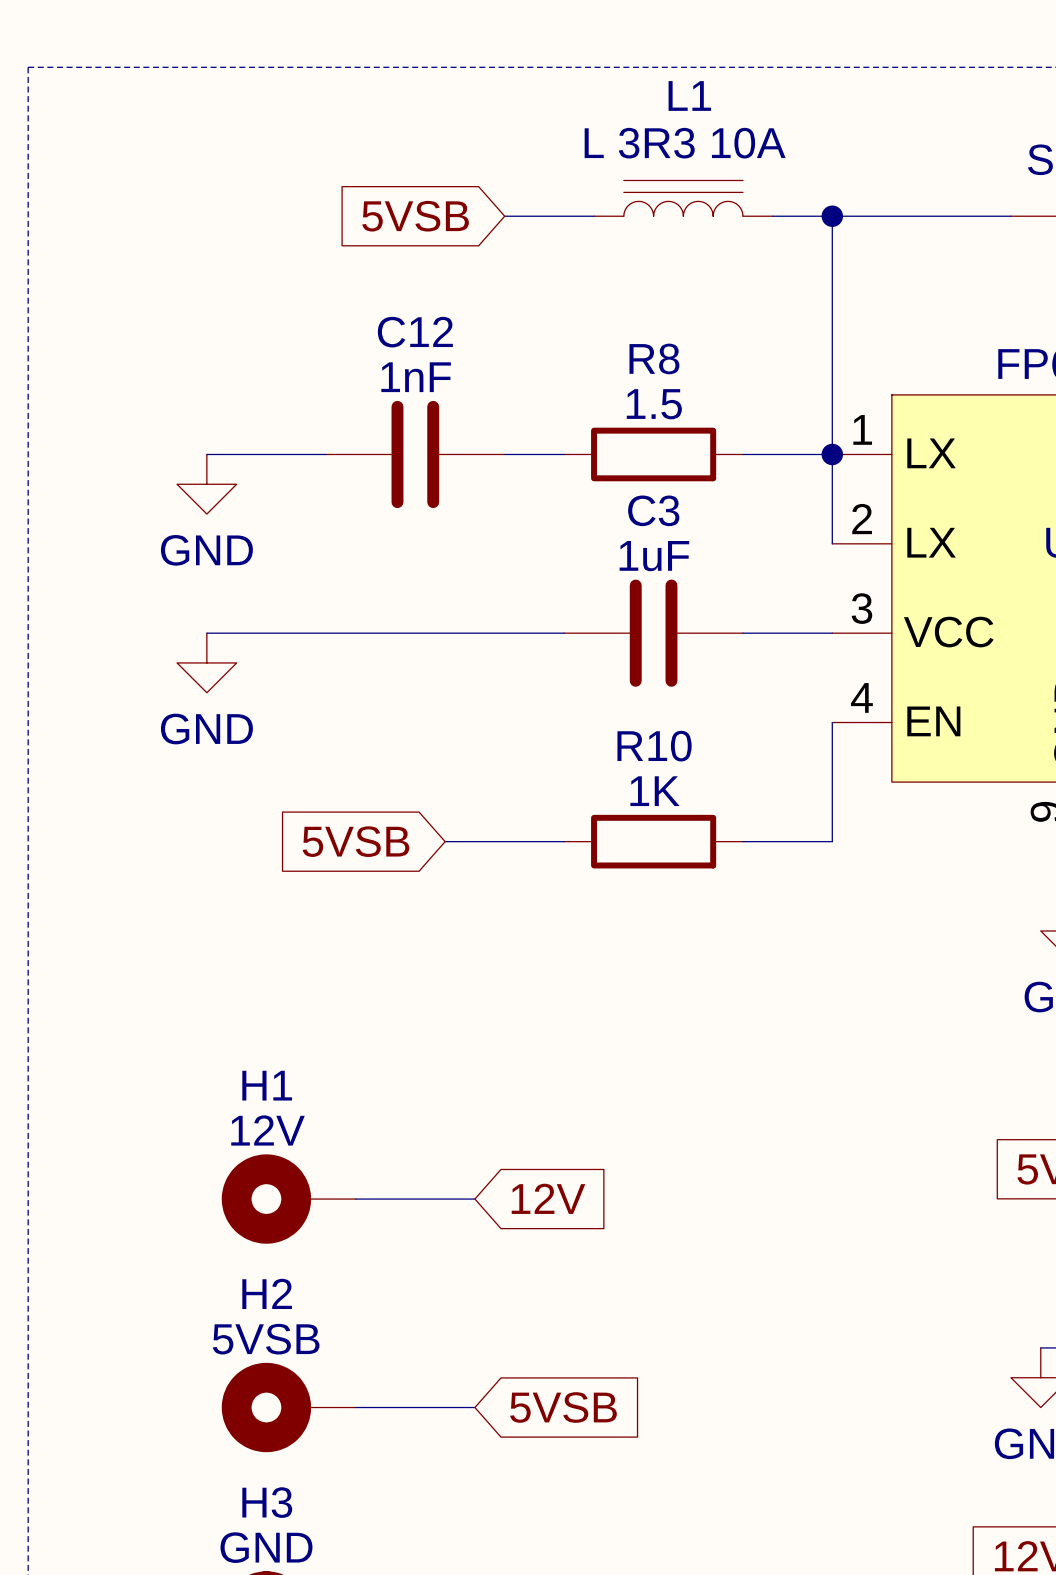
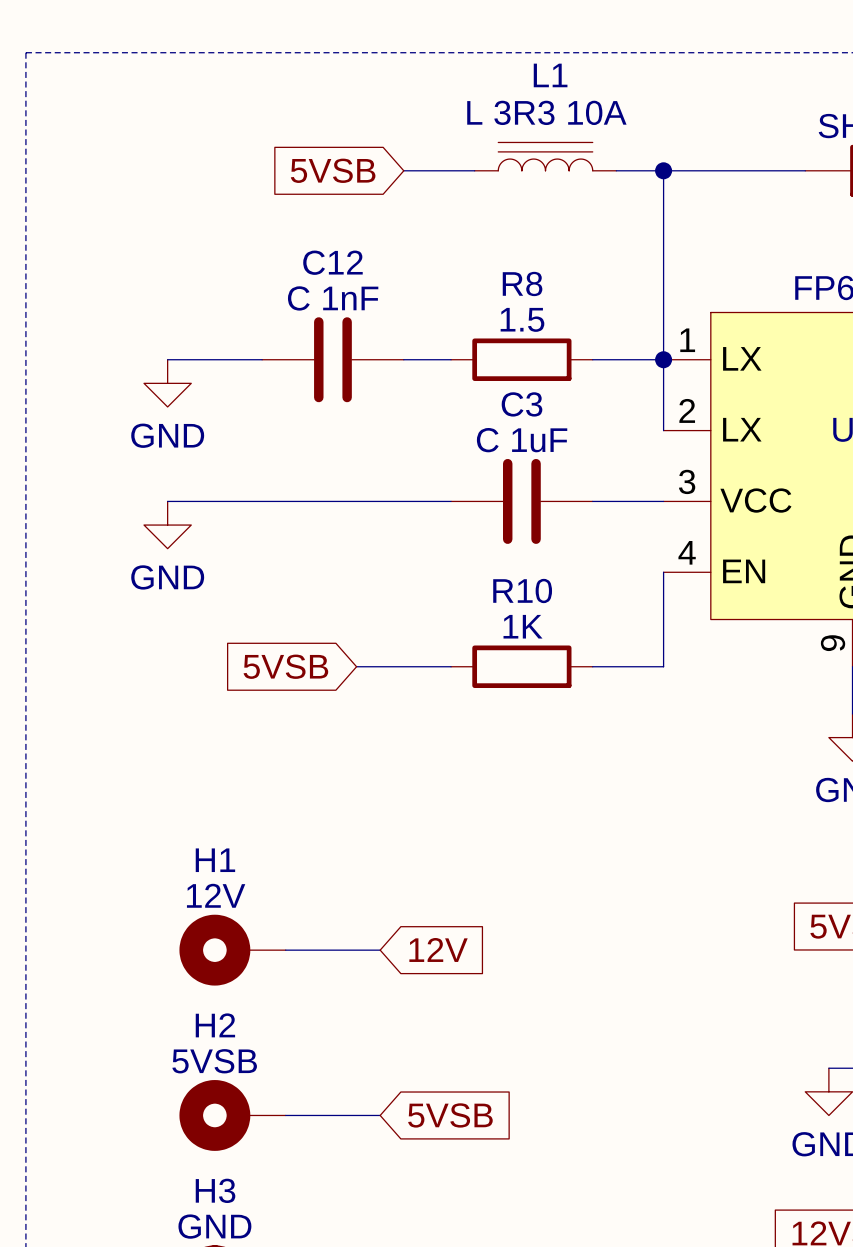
C12 value: 1nF (416, 377) -> C 1nF (333, 298)
C3 value: 1uF (654, 556) -> C 1uF (522, 440)

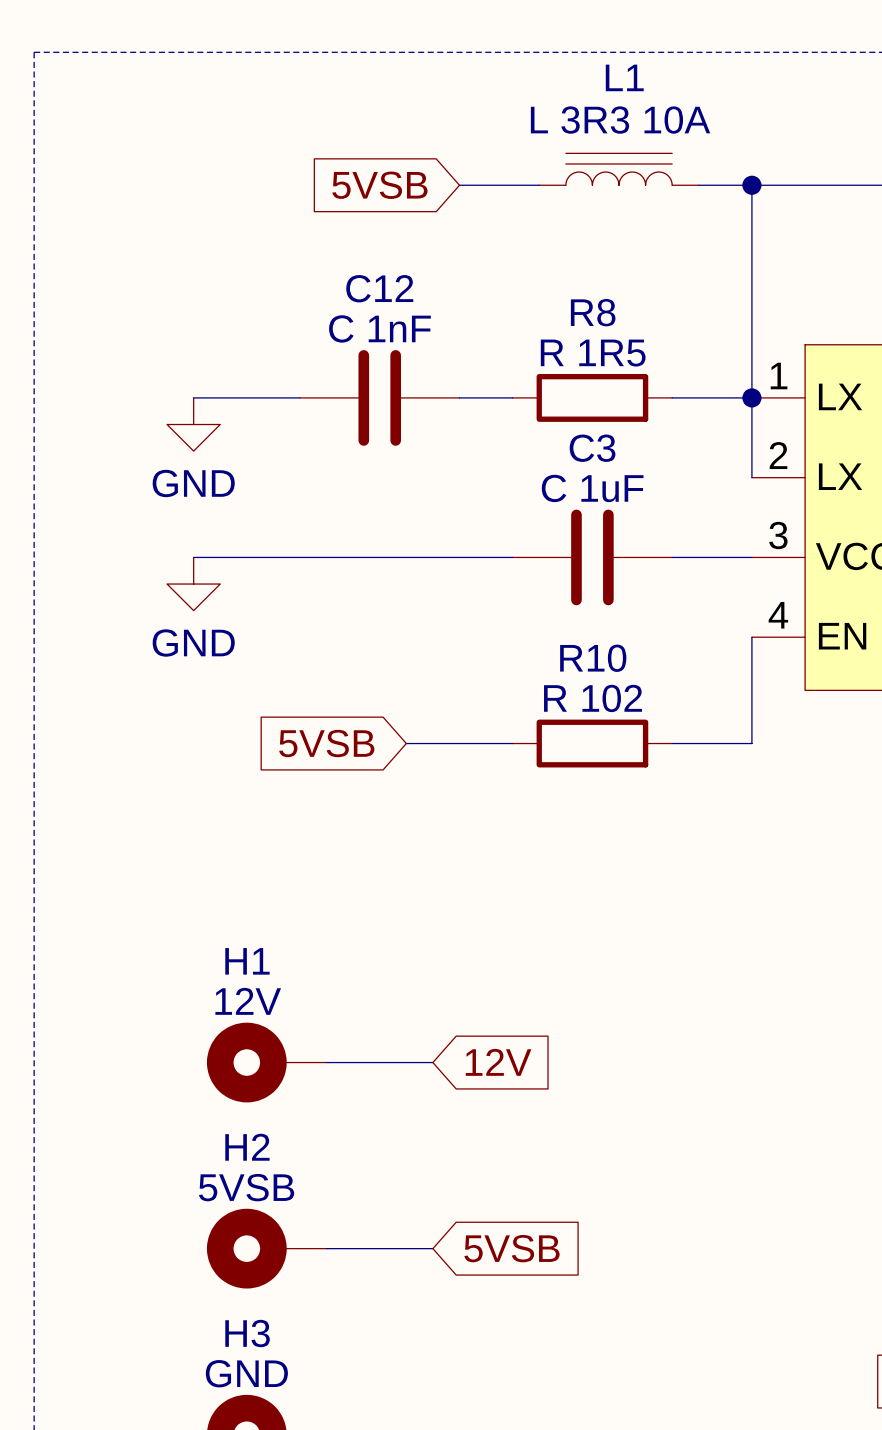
R8 value: 1.5 (522, 319) -> R 1R5 (593, 353)
R10 value: 1K (523, 626) -> R 102 (593, 698)

